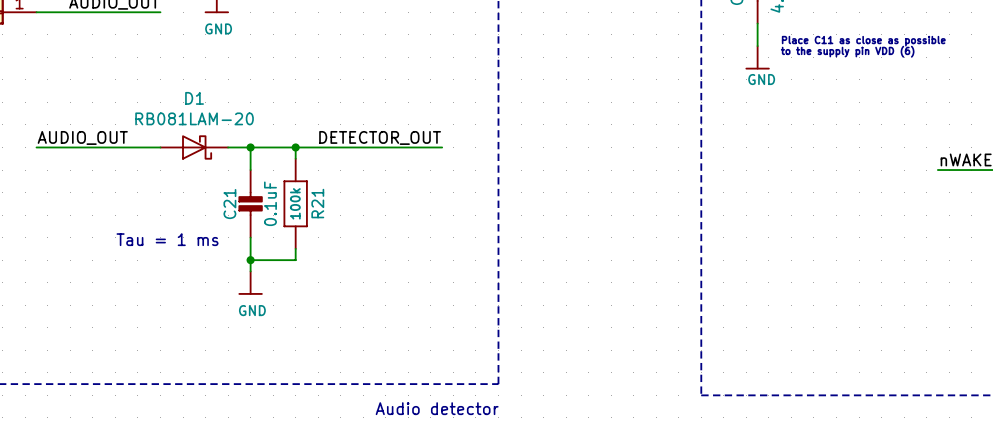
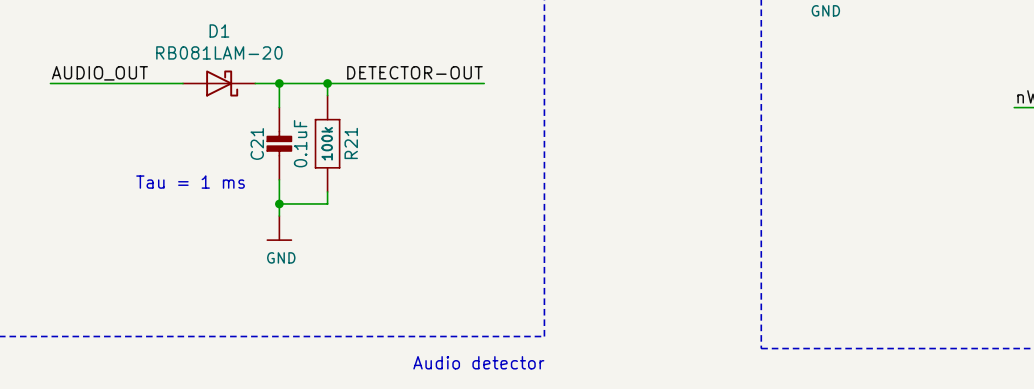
label: DETECTOR_OUT (380, 137) -> DETECTOR-OUT (414, 72)

